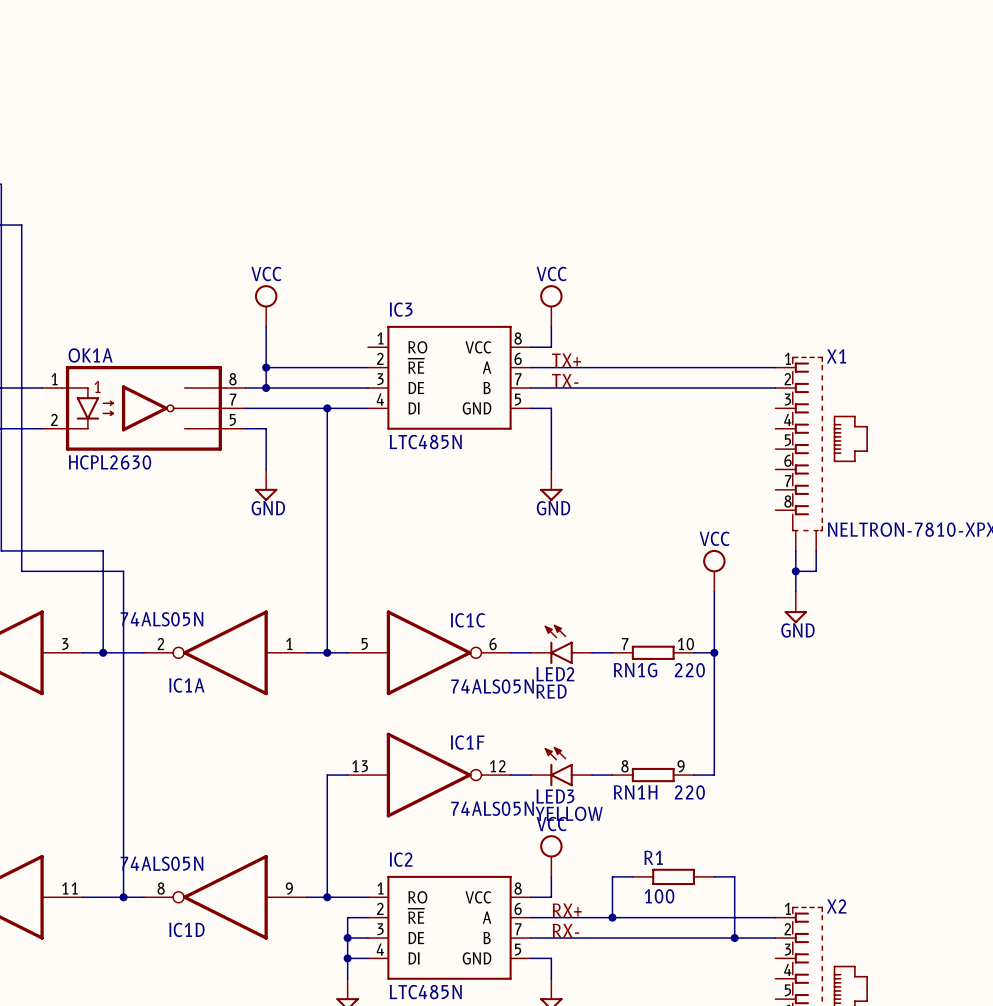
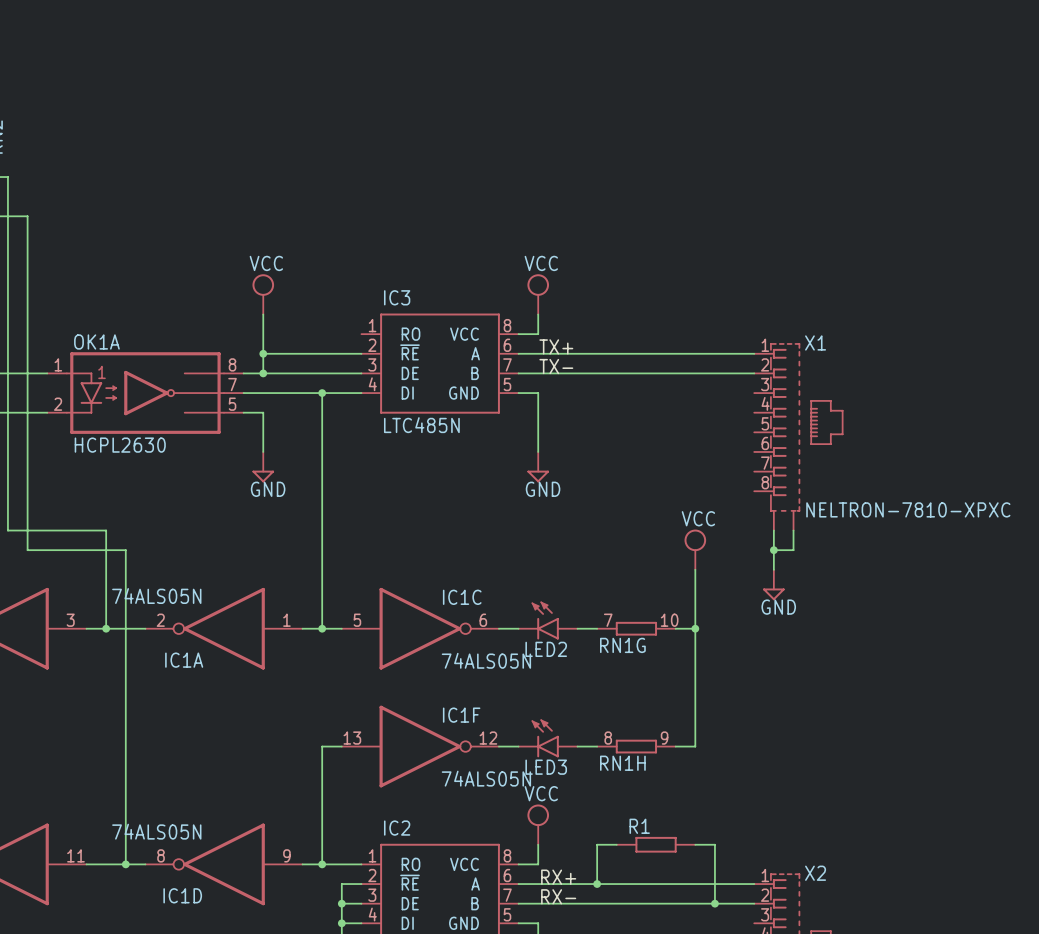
RN1G value: 220 (689, 670) -> none
LED2 value: RED (551, 691) -> none
RN1H value: 220 (689, 792) -> none
LED3 value: YELLOW (569, 813) -> none
R1 value: 100 (659, 896) -> none

